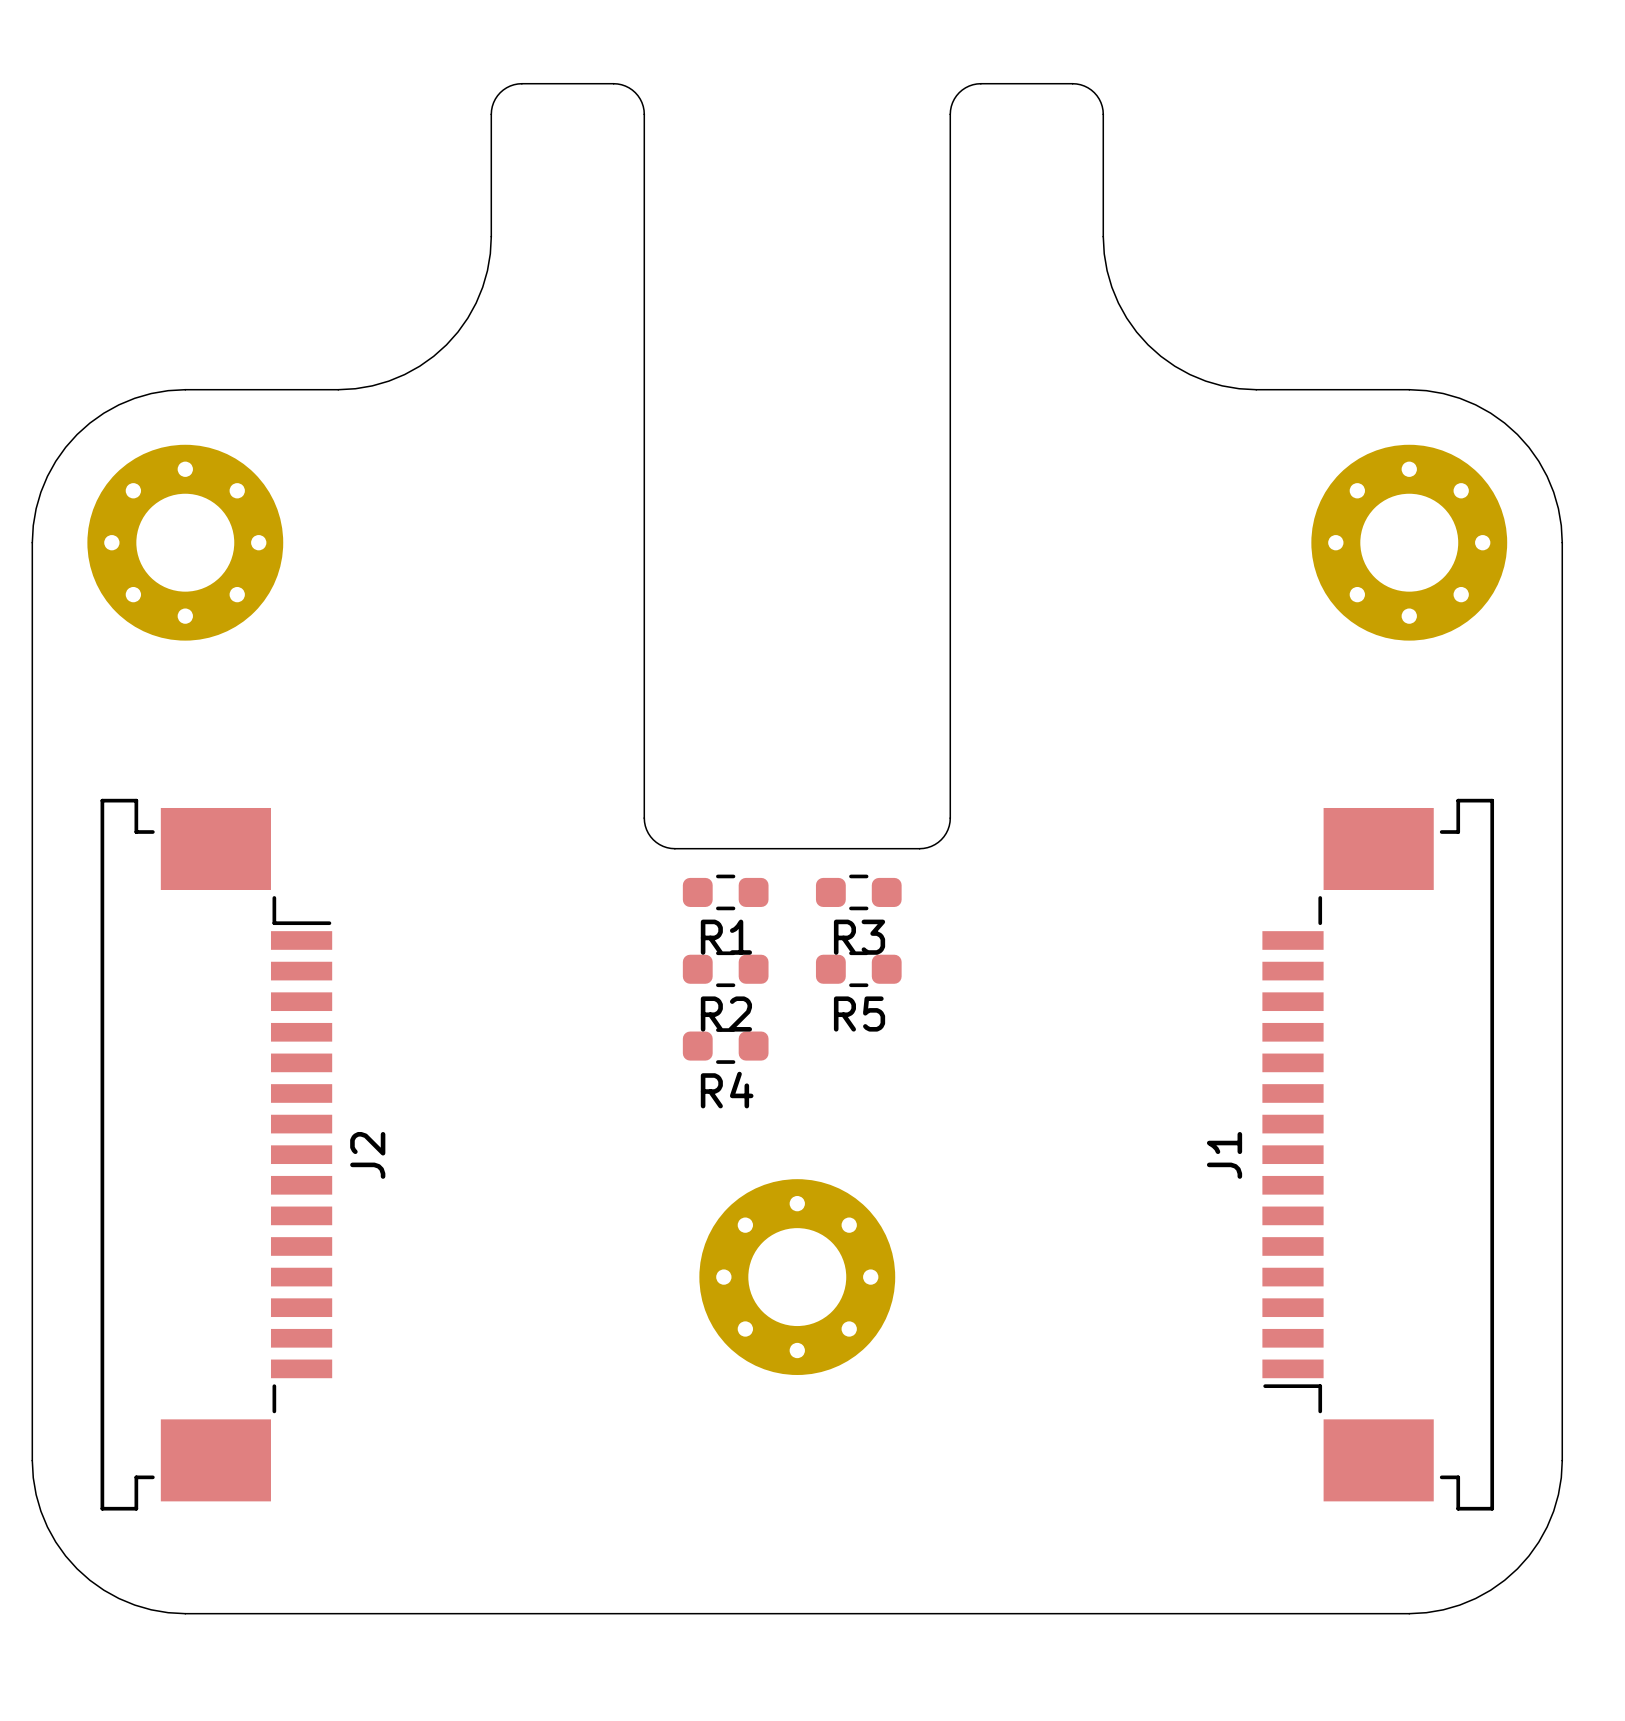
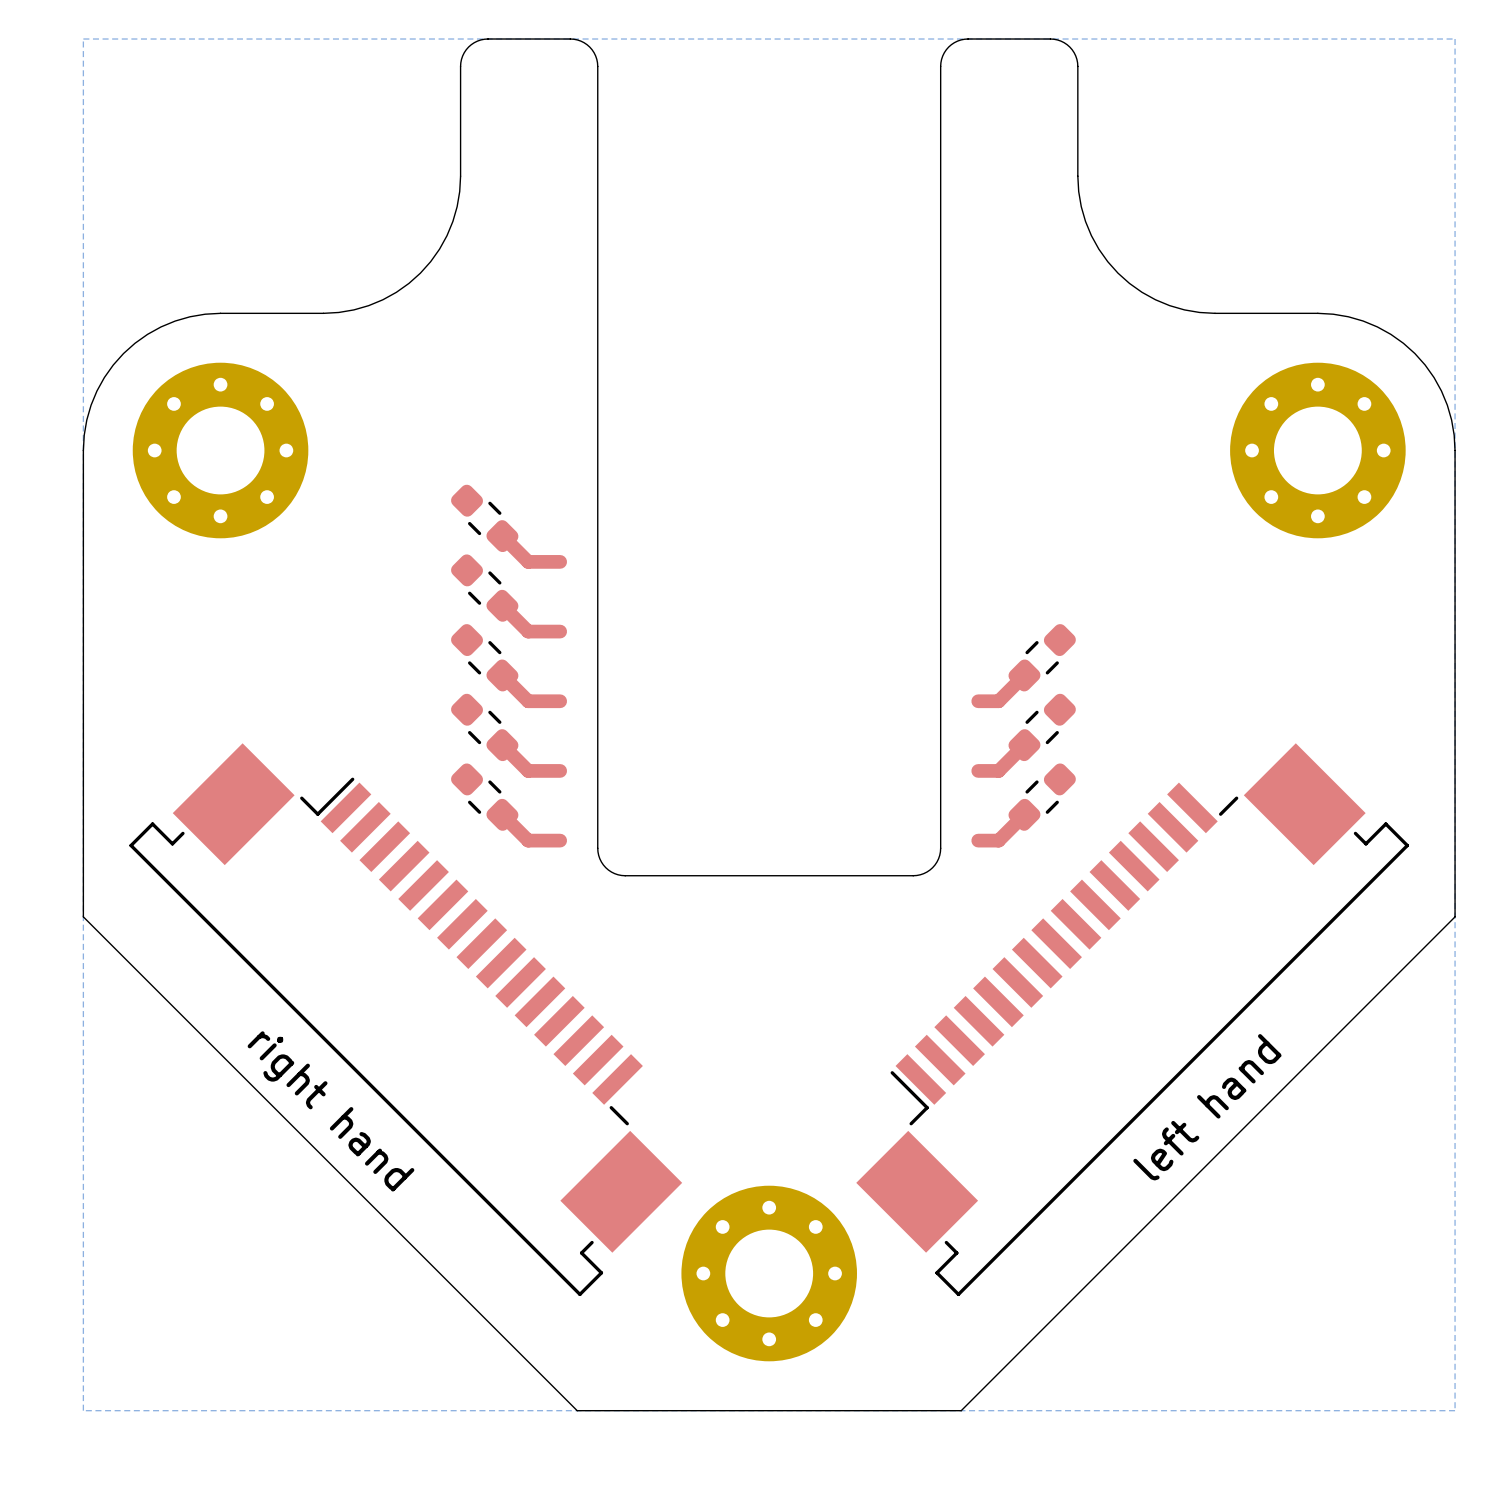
bottom zone outline: none -> (83, 39) (83, 1410) (1455, 1410) (1455, 39) (83, 39)
board edge: (521, 83) (510, 86) (503, 90) (497, 95) (492, 106) (490, 253) (482, 287) (467, 318) (457, 332) (446, 344) (419, 366) (388, 381) (355, 388) (300, 389) -> (522, 39) (480, 39) (468, 47) (462, 55) (460, 66) (459, 191) (452, 221) (439, 249) (430, 261) (408, 283) (382, 299) (353, 309) (323, 313)
board edge: (575, 83) (613, 83) (625, 86) (637, 95) (644, 110) (644, 818) (646, 829) (653, 839) (663, 846) (674, 848) (923, 848) (938, 842) (947, 829) (950, 818) (950, 110) (956, 95) (969, 86) (980, 83) (1019, 83) -> (570, 39) (580, 41) (589, 47) (595, 55) (597, 66) (597, 851) (601, 862) (608, 870) (625, 875) (913, 875) (929, 870) (938, 858) (940, 848) (940, 66) (942, 55) (948, 47) (957, 41) (968, 39)
board edge: (1072, 83) (1084, 86) (1091, 90) (1096, 95) (1102, 106) (1104, 253) (1111, 287) (1126, 318) (1136, 332) (1148, 344) (1174, 366) (1205, 381) (1239, 388) (1294, 389) -> (1016, 39) (1057, 39) (1069, 47) (1075, 55) (1077, 66) (1078, 191) (1085, 221) (1098, 249) (1107, 261) (1129, 283) (1155, 299) (1184, 309) (1215, 313)
part: none -> (484, 518)
top track: none -> (502, 536) (528, 561) (560, 561)
part: none -> (484, 588)
top track: none -> (502, 605) (528, 631) (560, 631)
part: none -> (484, 657)
part: none -> (1042, 657)
top track: none -> (502, 675) (528, 701) (560, 701)
top track: none -> (1024, 675) (998, 701) (978, 701)
part: none -> (484, 727)
part: none -> (1042, 727)
top track: none -> (502, 745) (528, 770) (560, 770)
top track: none -> (1024, 745) (998, 770) (978, 770)
R1: (725, 892) -> none
R3: (858, 892) -> none
part: none -> (484, 797)
part: none -> (1042, 797)
top track: none -> (502, 814) (528, 840) (560, 840)
top track: none -> (1024, 814) (998, 840) (978, 840)
R2: (725, 969) -> none
R5: (858, 969) -> none
R4: (725, 1046) -> none
board edge: (32, 1062) (33, 1477) (40, 1511) (47, 1527) (55, 1542) (77, 1568) (103, 1590) (118, 1598) (134, 1605) (168, 1612) (583, 1613) -> (83, 916) (577, 1410)
board edge: (1562, 1062) (1561, 1477) (1553, 1511) (1547, 1527) (1538, 1542) (1517, 1568) (1490, 1590) (1475, 1598) (1459, 1605) (1426, 1612) (1011, 1613) -> (1455, 916) (961, 1410)
J2: (216, 1154) -> none
J1: (1378, 1154) -> none
part: none -> (405, 1019)
part: none -> (1132, 1019)
text: none -> left hand (1207, 1107)
part position: (797, 1277) -> (769, 1273)
text: none -> right hand (331, 1111)

